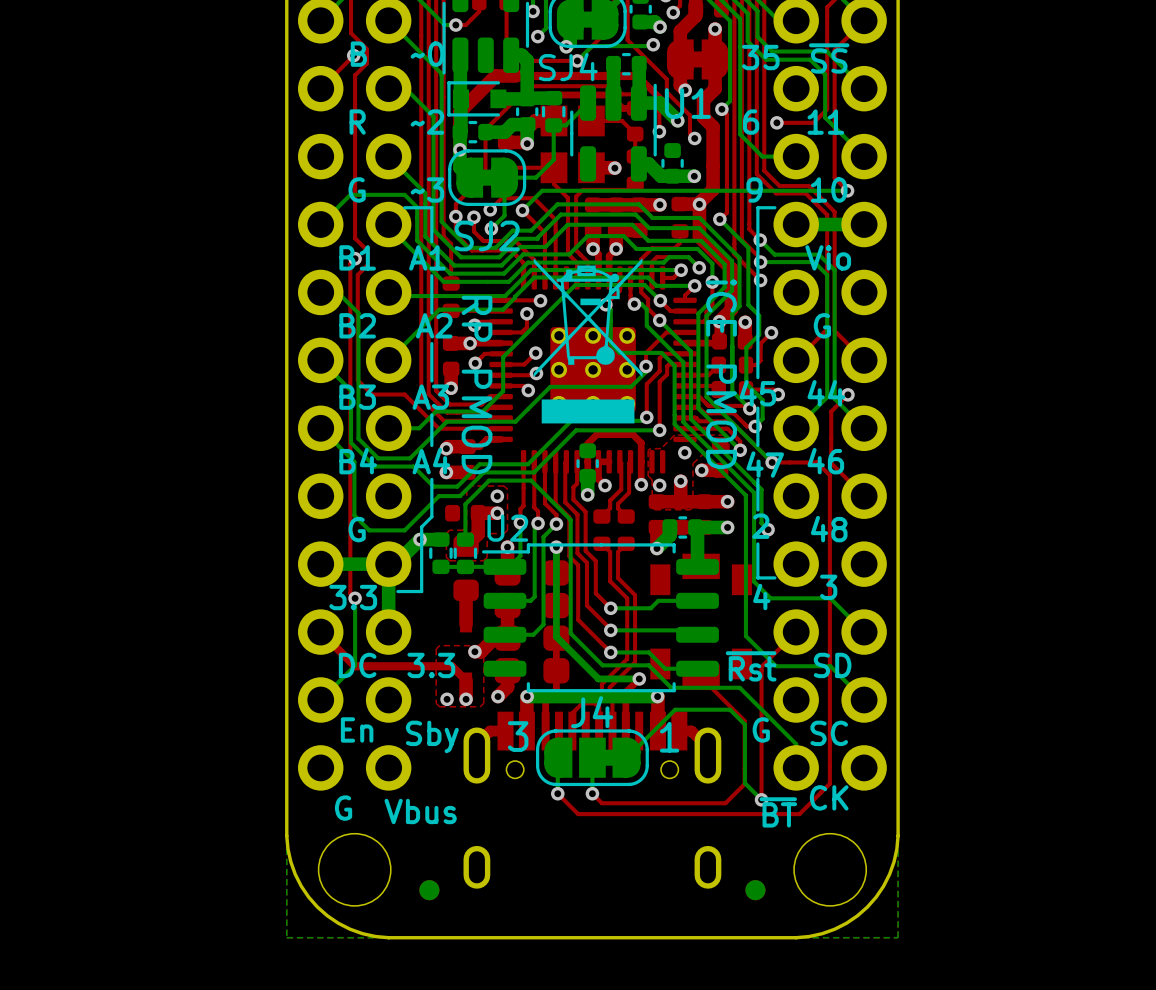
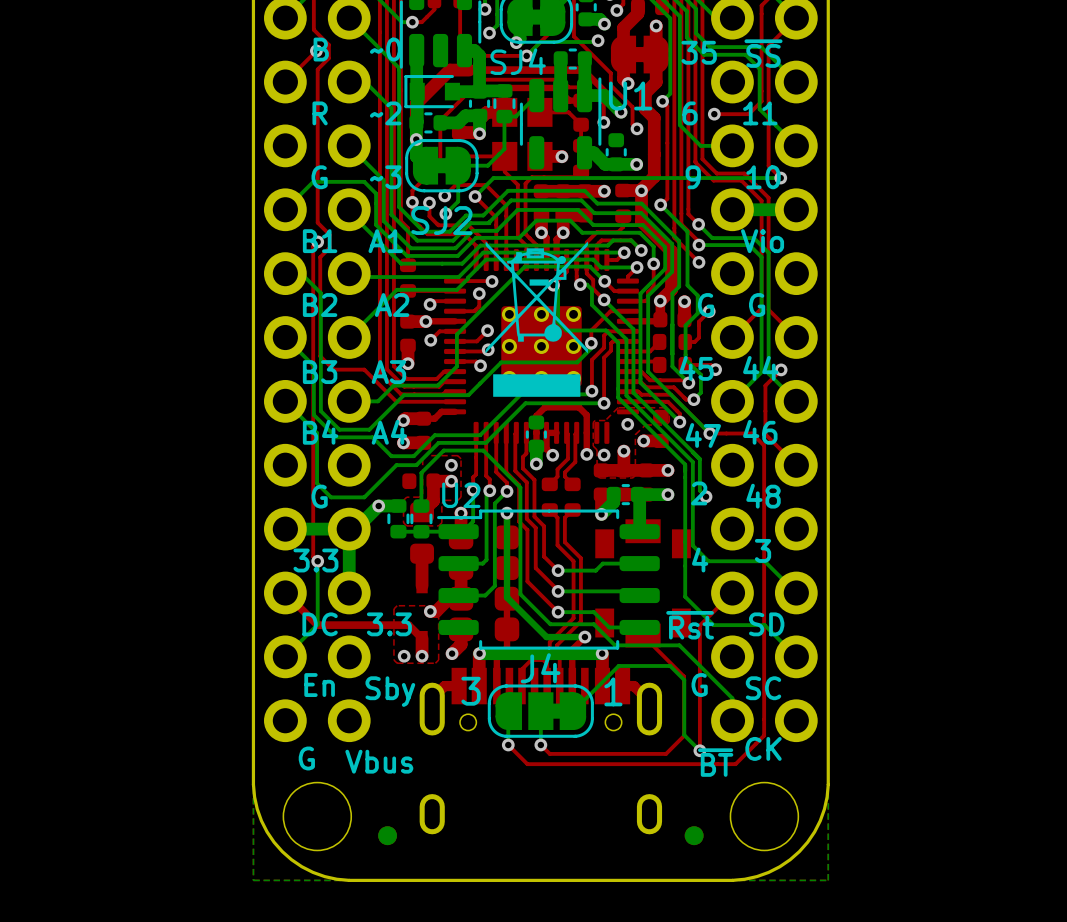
line: (404, 207) (431, 207) (431, 241) -> none
line: (774, 207) (757, 207) (757, 377) -> none
line: (431, 275) (431, 313) -> none
text: none -> G (706, 305)
line: (431, 343) (431, 380) -> none
text: iCE PMOD (721, 374) -> none
text: RP PMOD (477, 384) -> none
line: (757, 408) (757, 445) -> none
line: (431, 414) (431, 445) -> none
line: (431, 479) (431, 516) (421, 527) (421, 591) (397, 591) -> none
line: (757, 479) (757, 510) -> none
line: (757, 543) (757, 577) (774, 577) -> none

